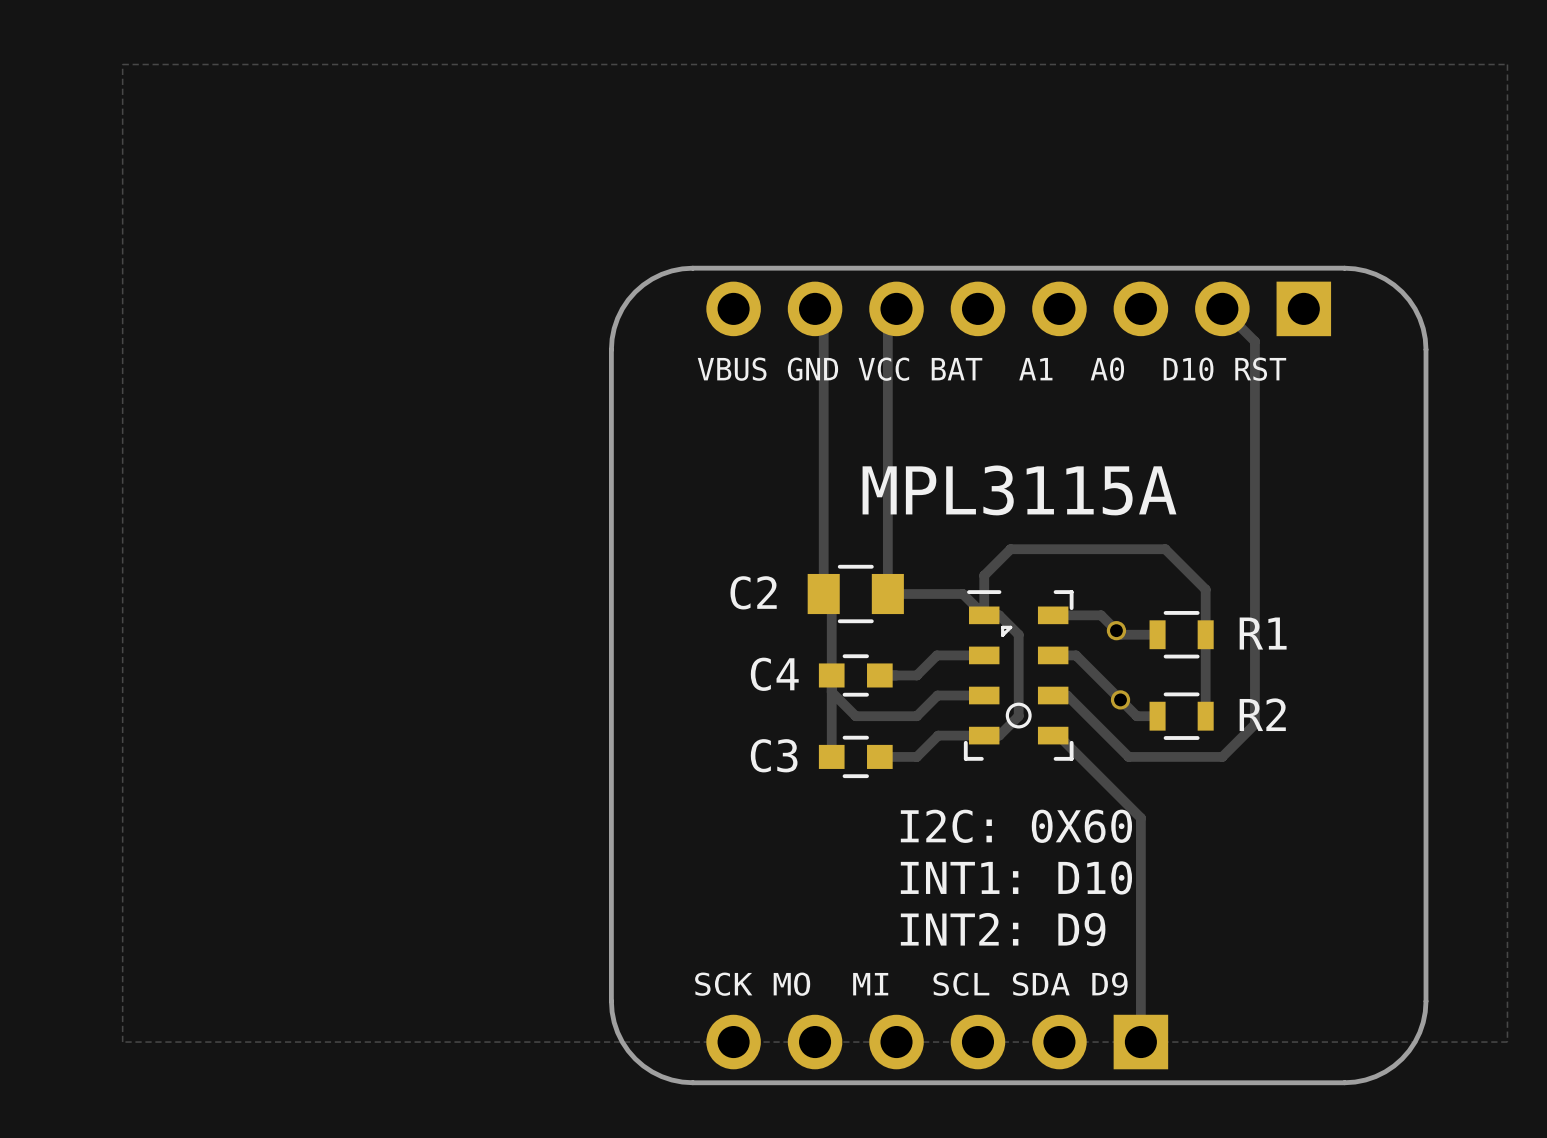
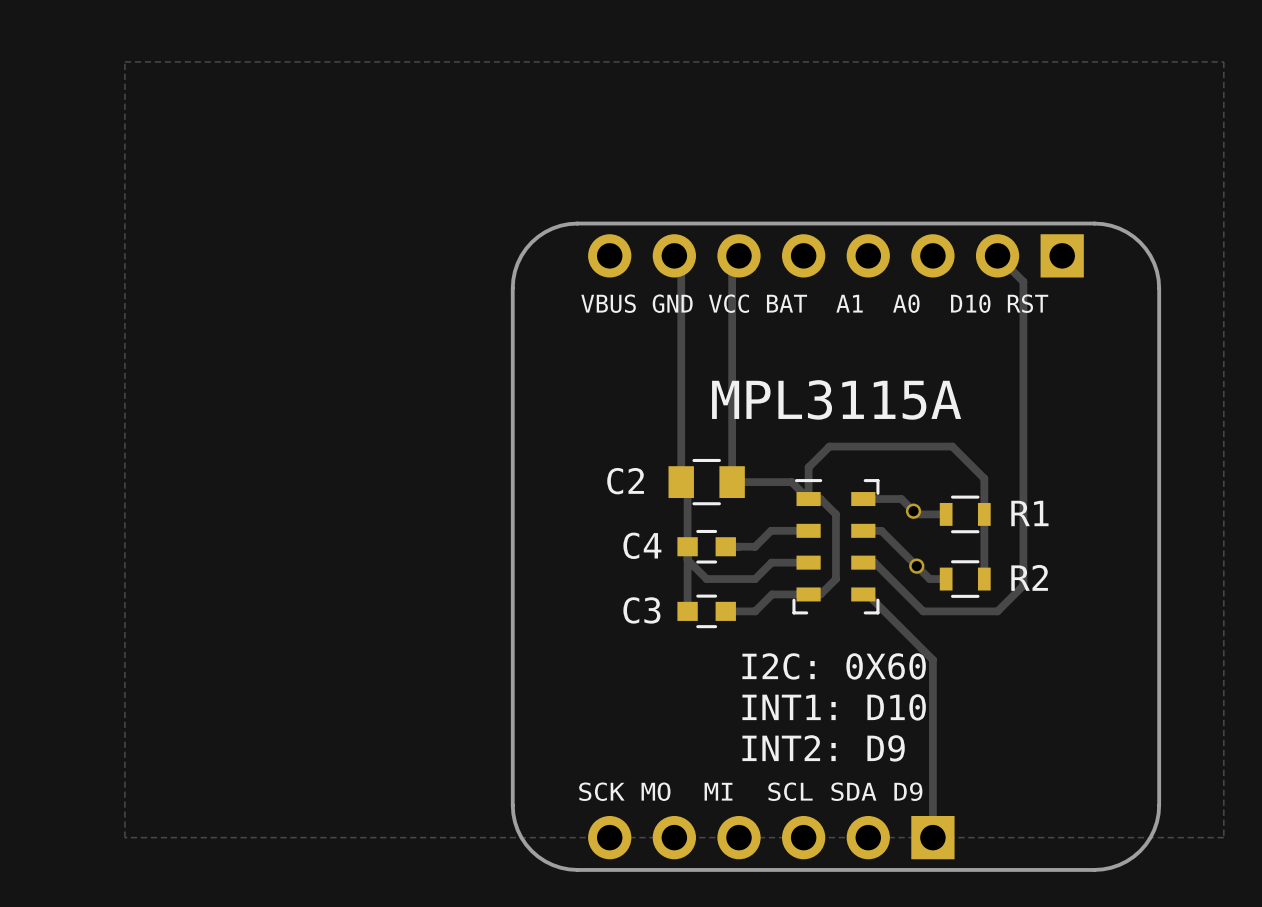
part footprint: [963, 590, 1074, 761] -> [792, 479, 880, 615]

